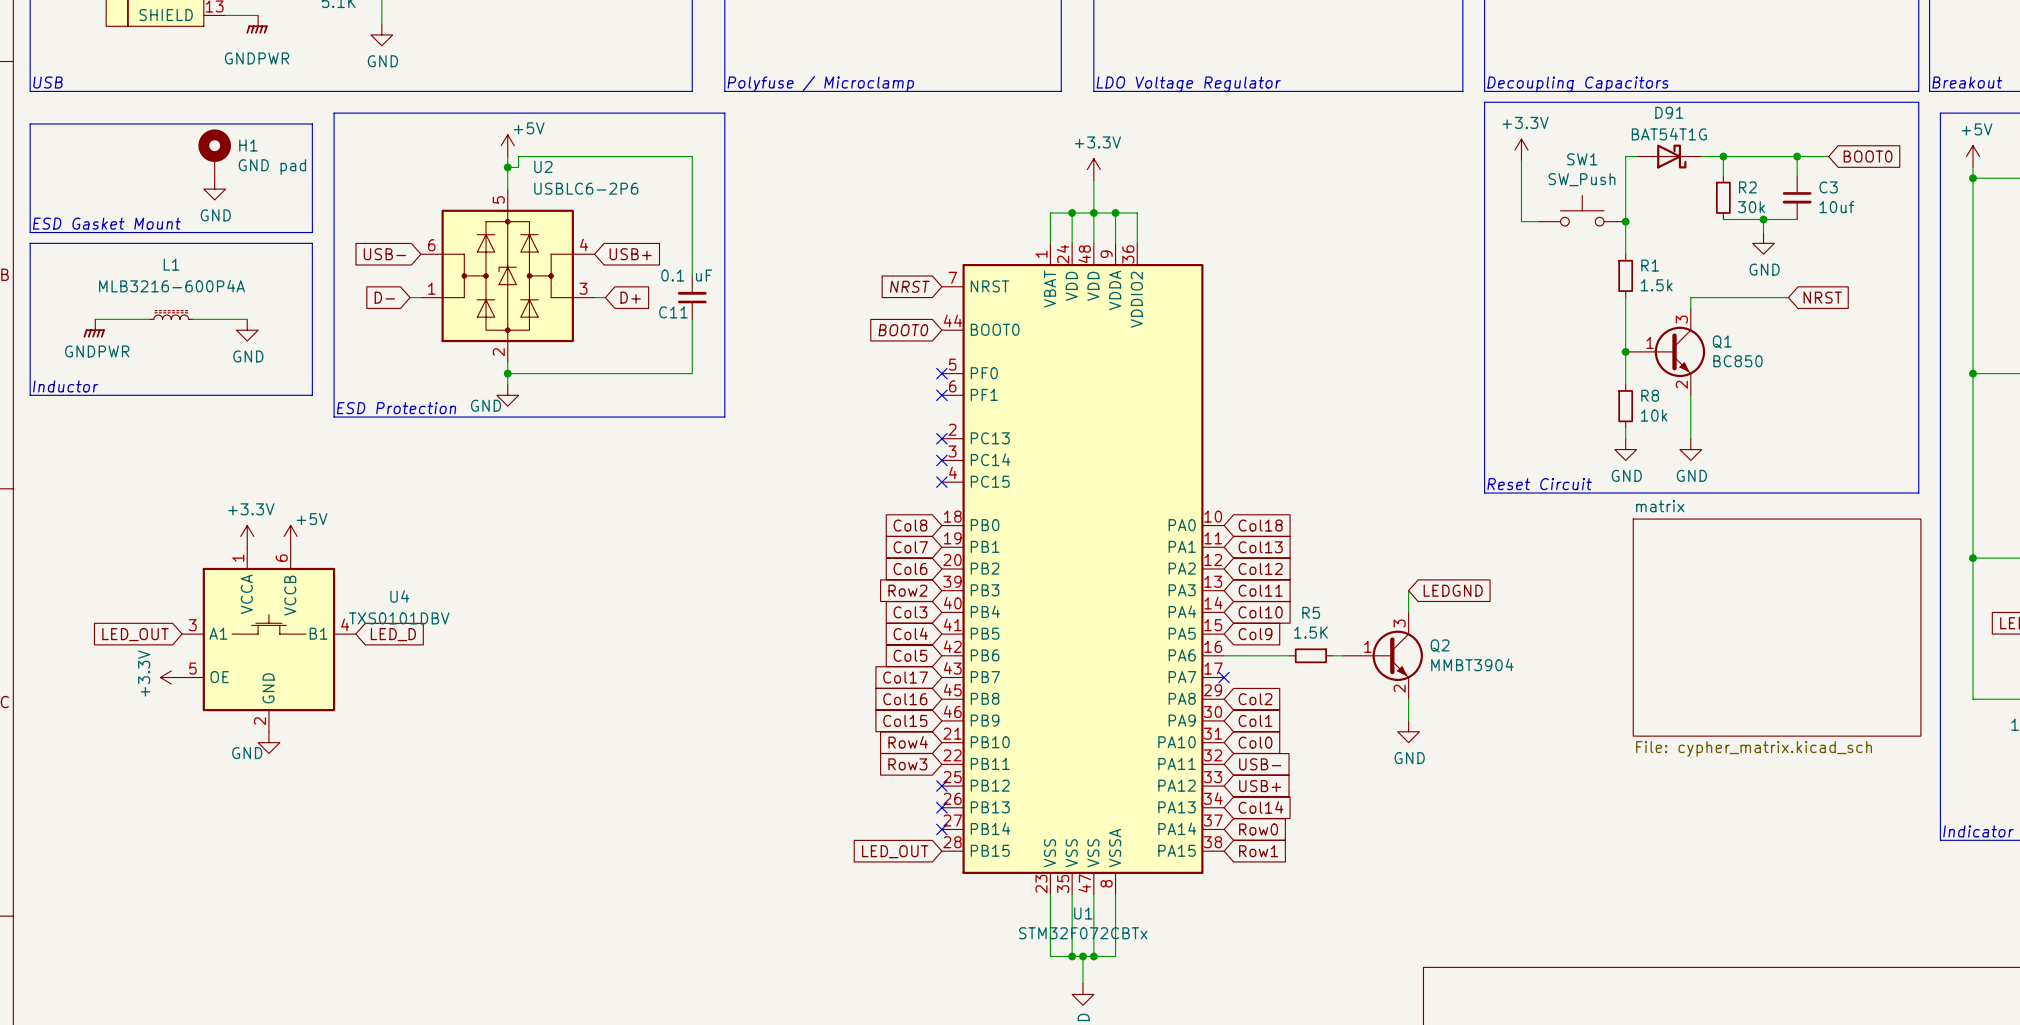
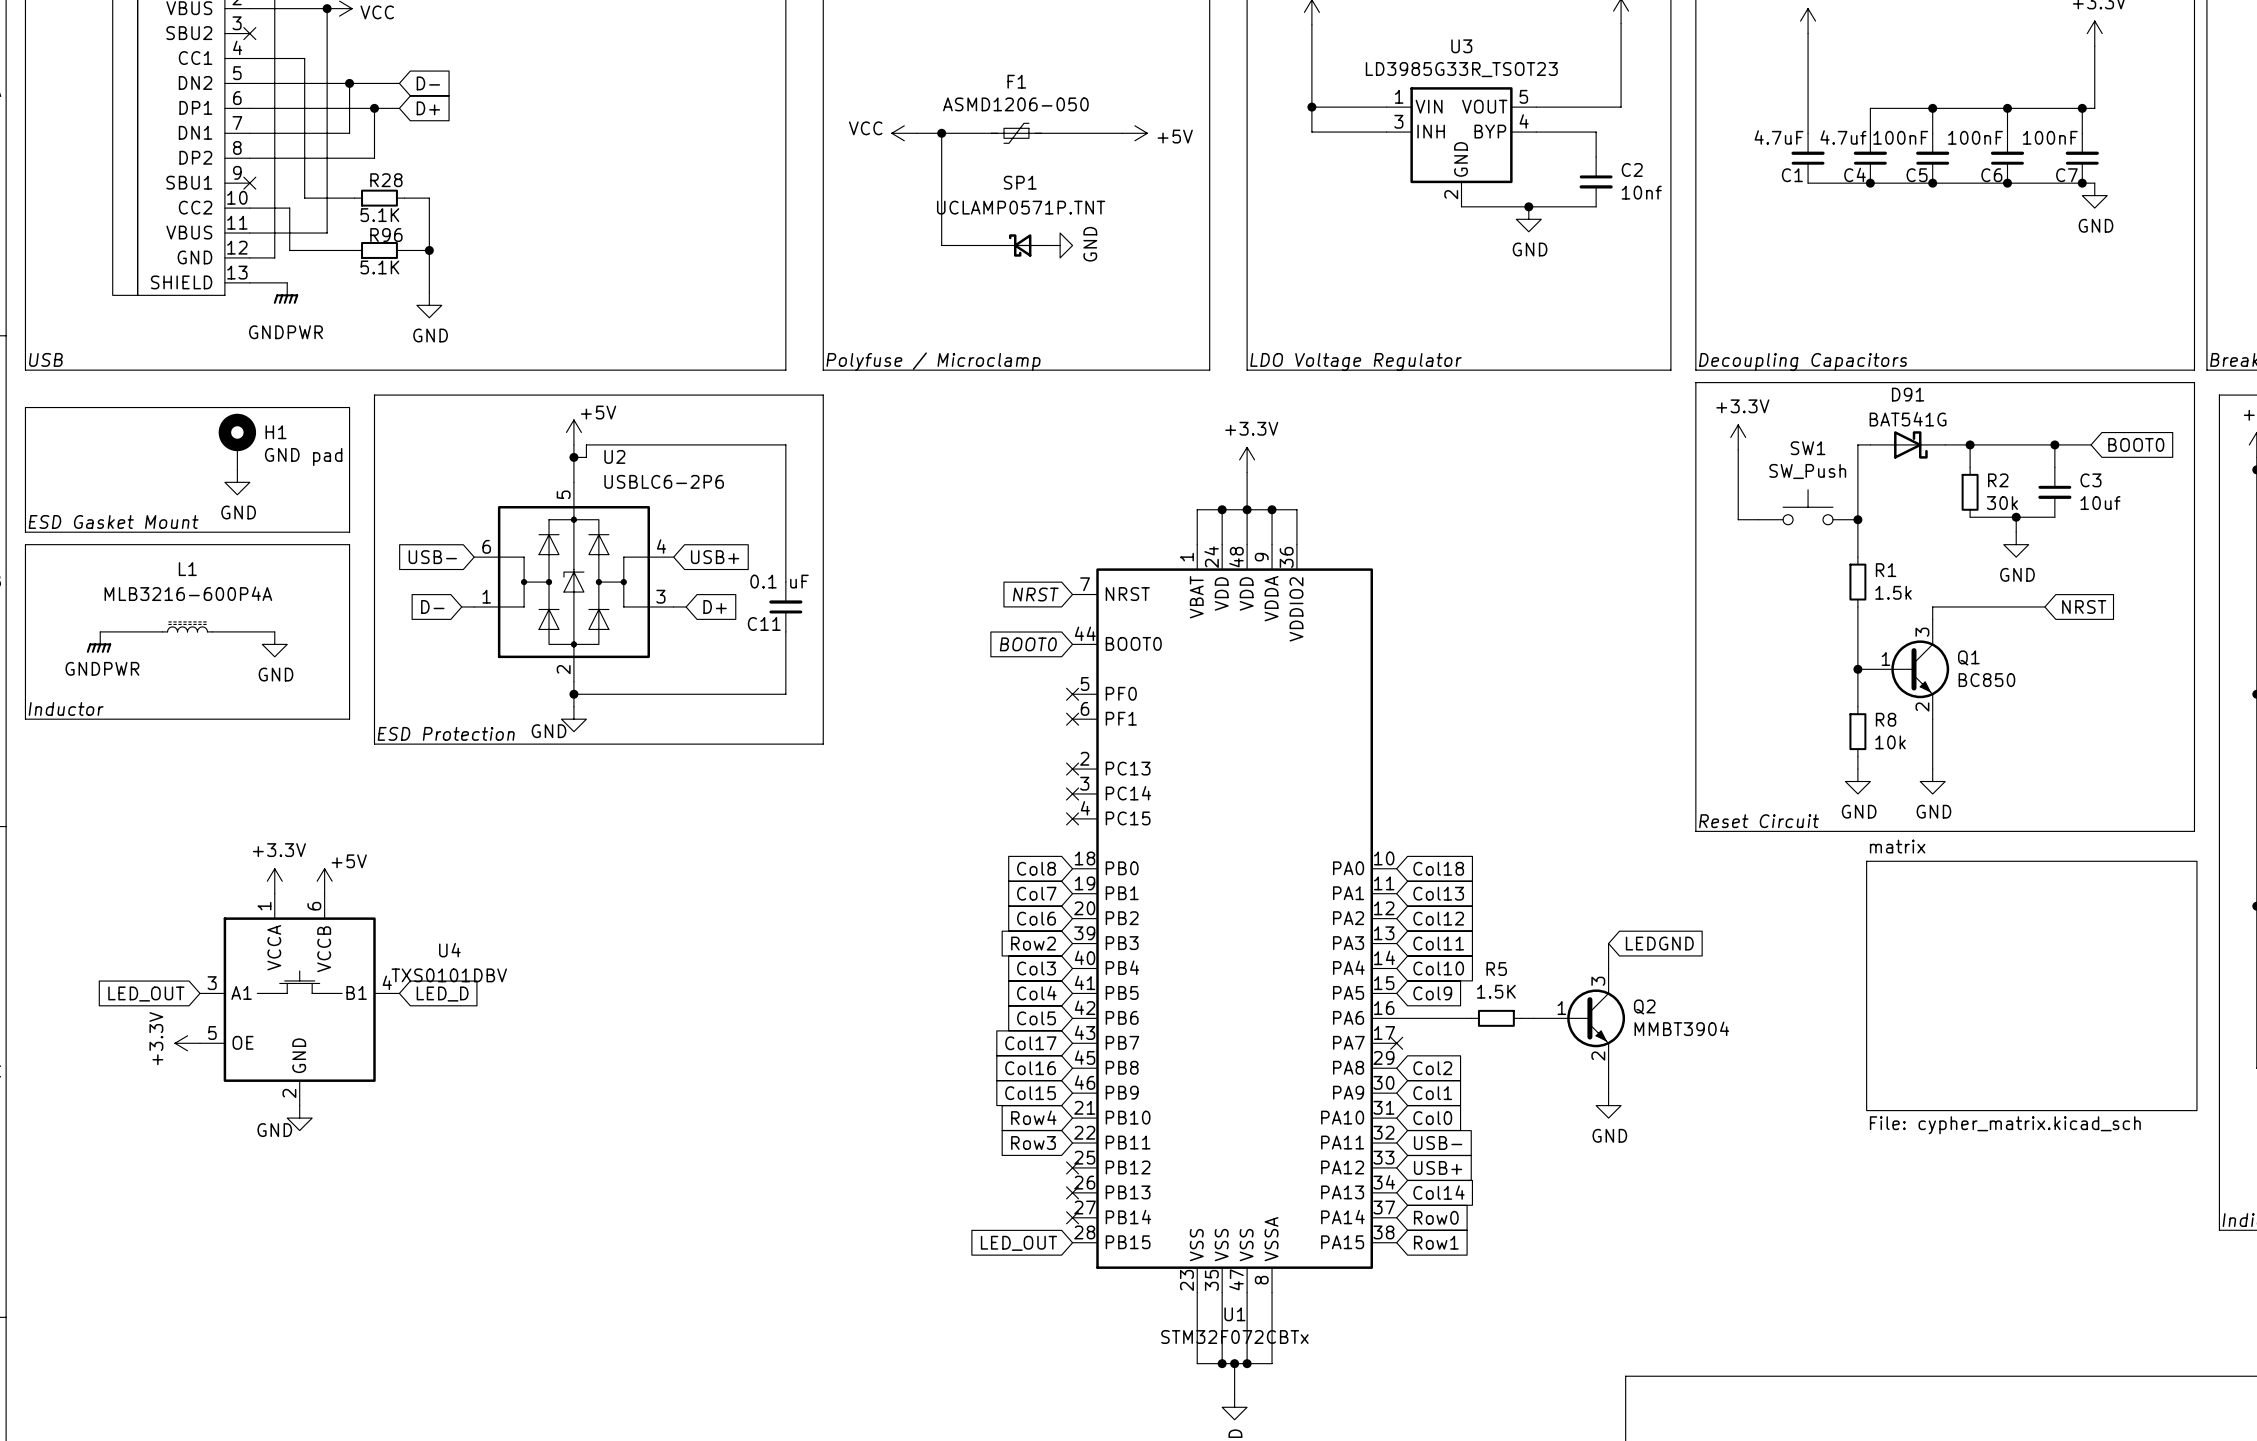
D91 value: BAT54T1G (1669, 134) -> BAT541G (1908, 419)

